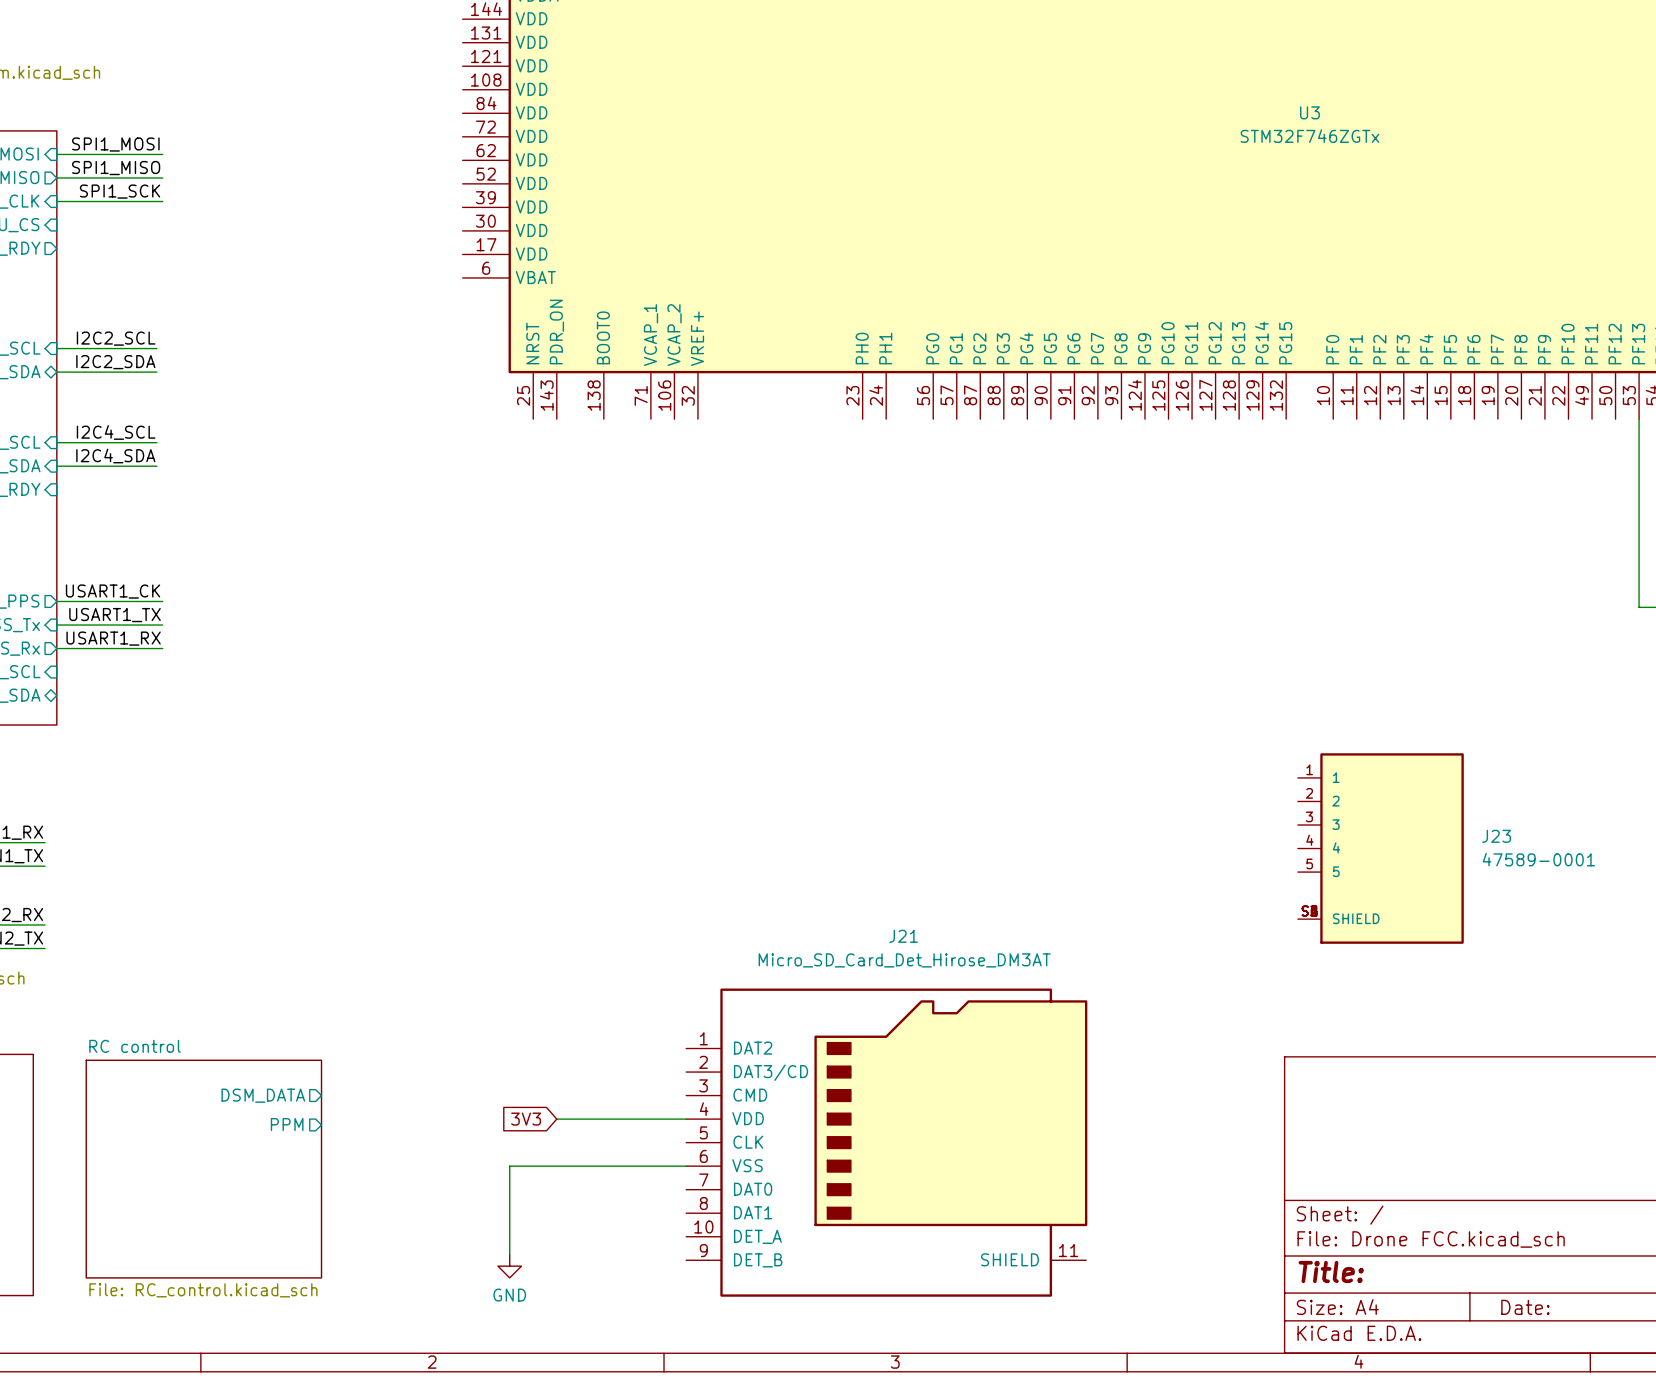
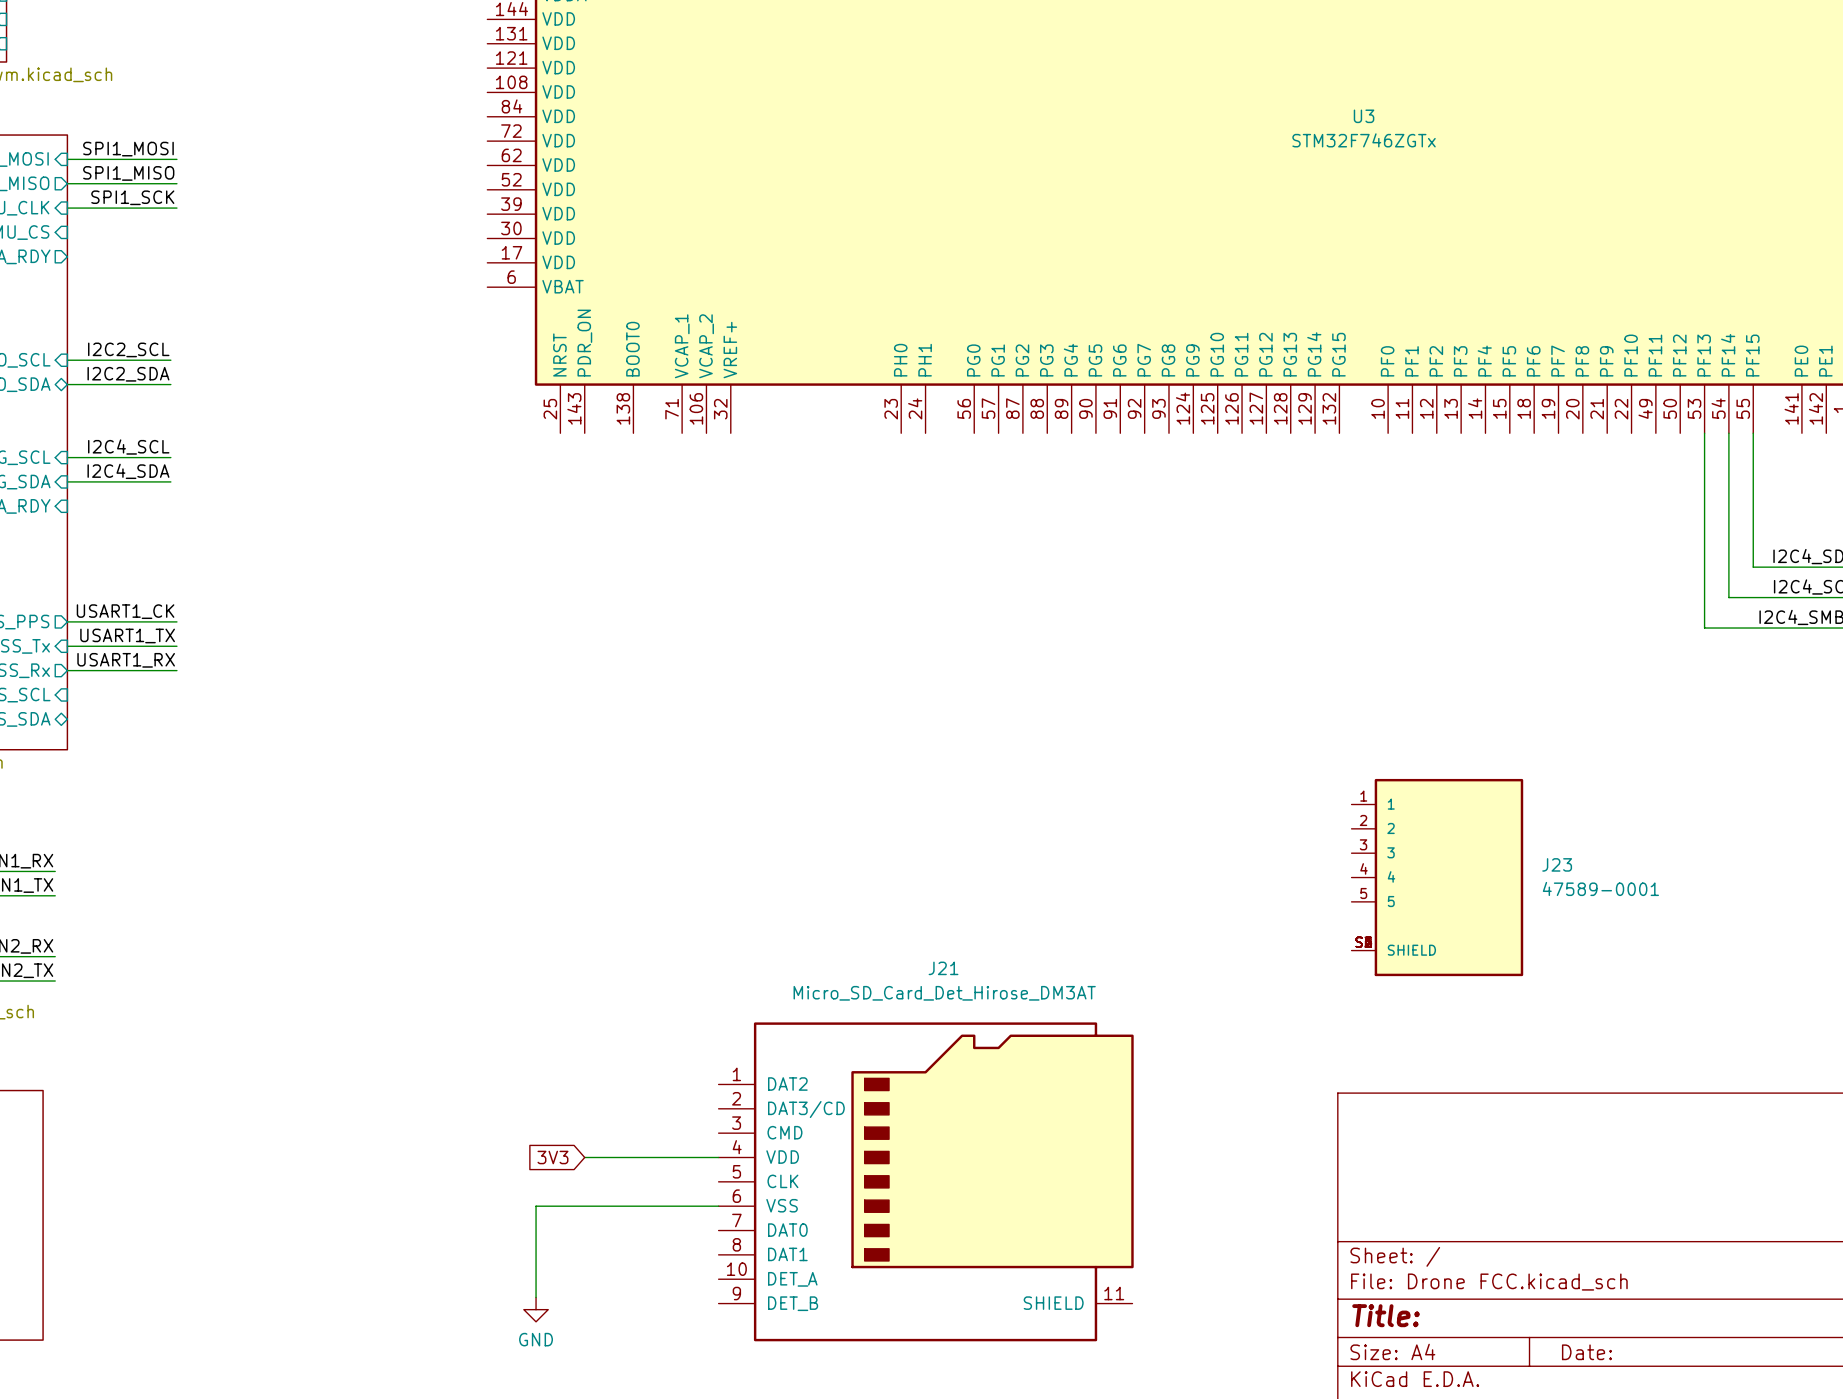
sheet pin: DSM_DATA (263, 1095) -> none
sheet pin: PPM (287, 1124) -> none
sheet RC control: File: RC_control.kicad_sch (203, 1169) -> none

